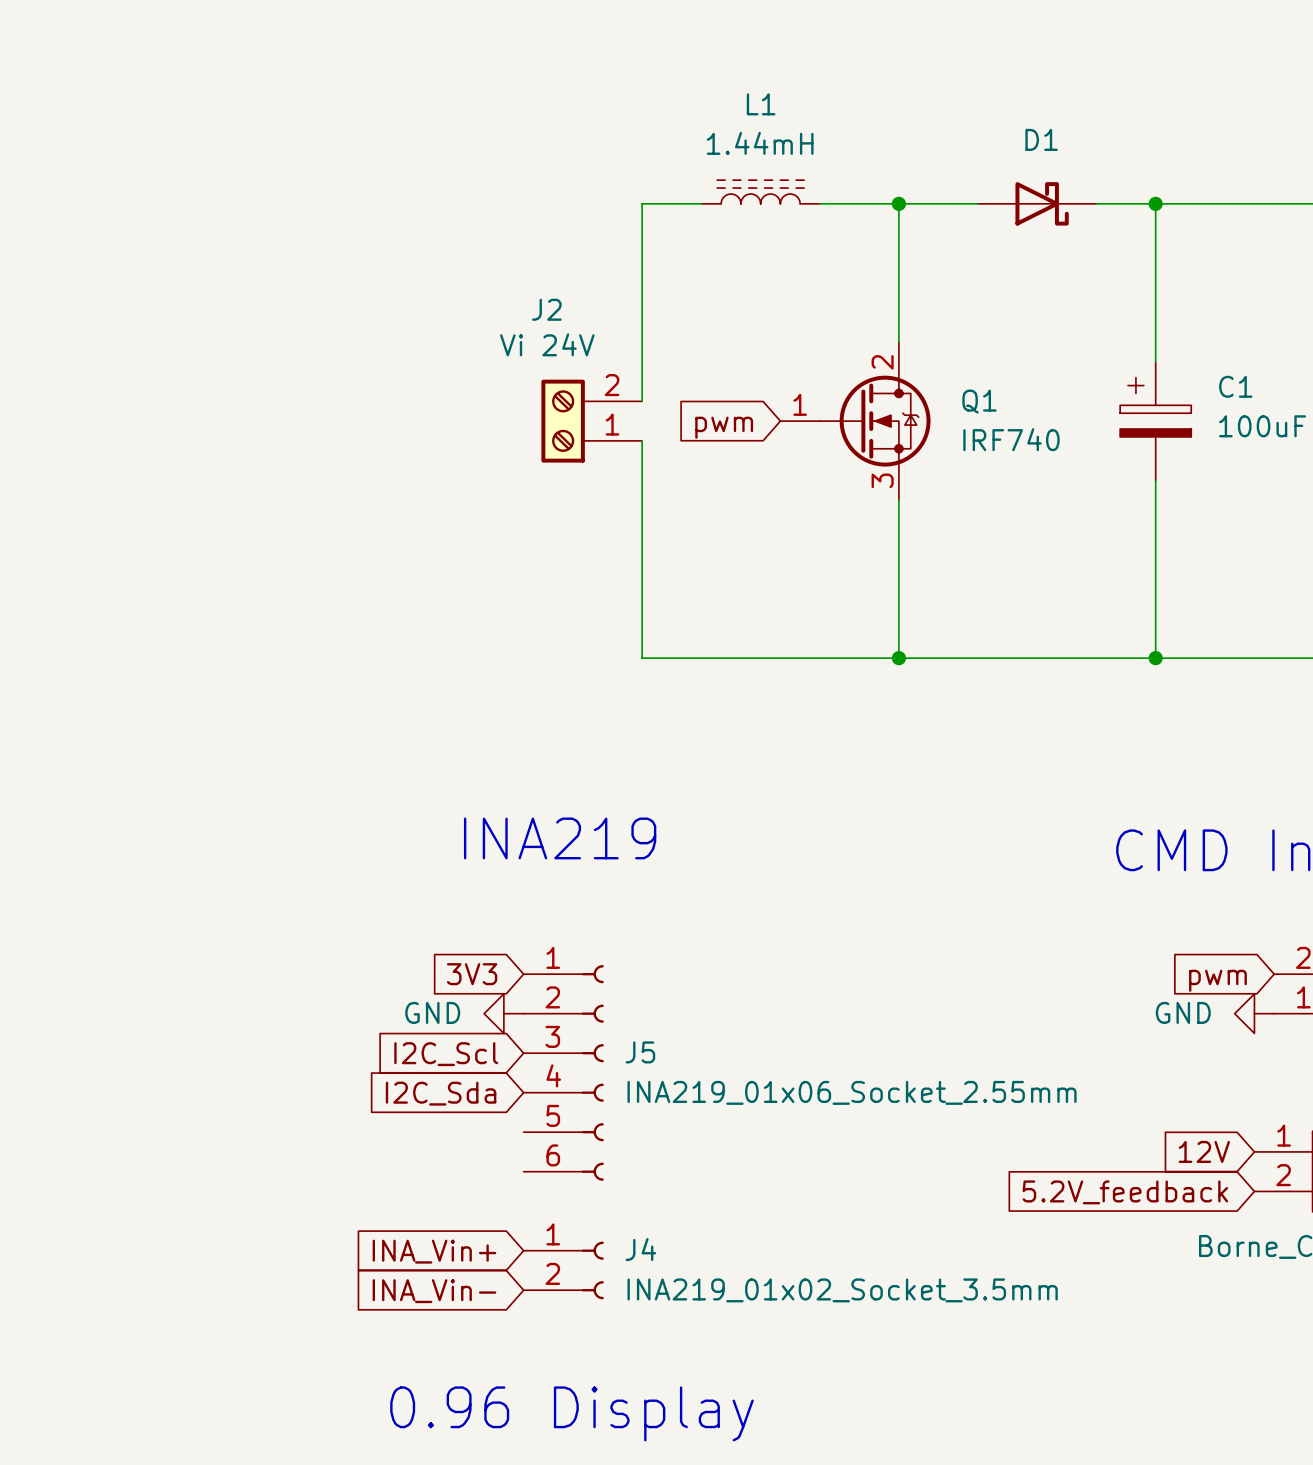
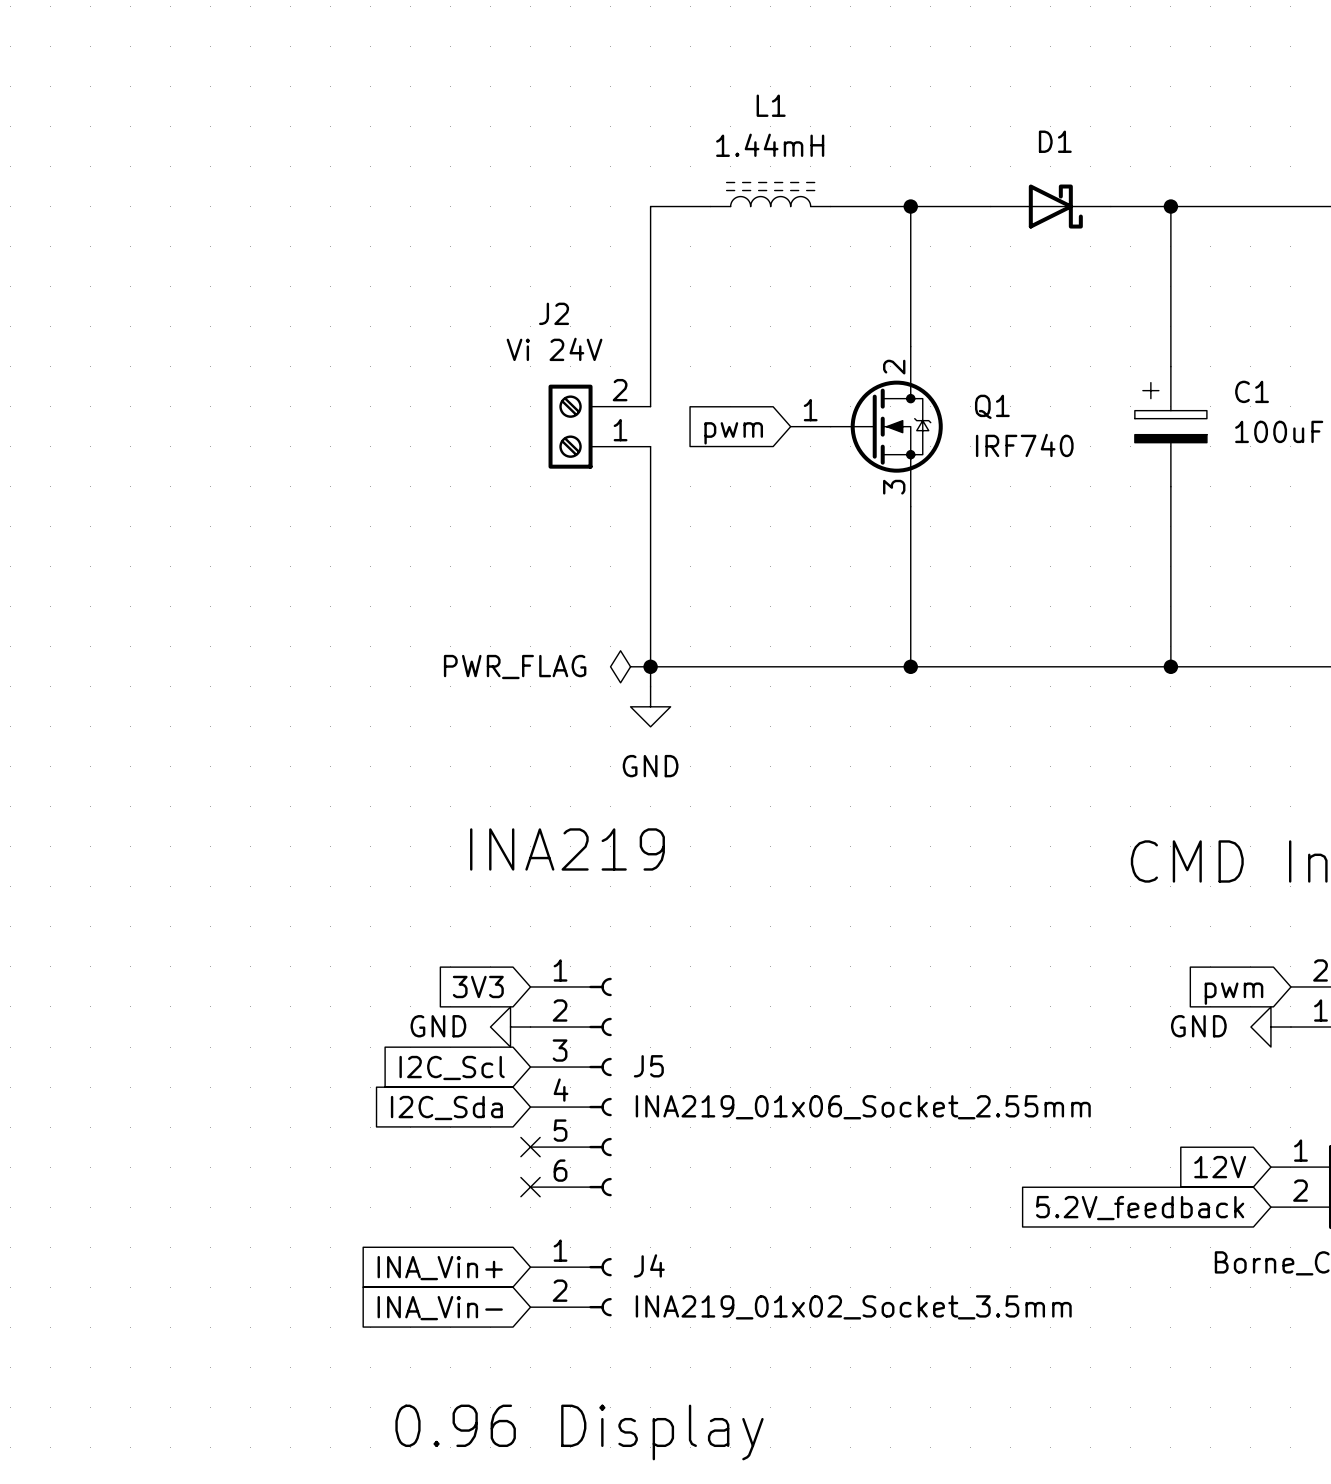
power symbol: none -> PWR_FLAG (630, 666)
wire: none -> (650, 666) (650, 686)
junction: none -> (650, 666)
power symbol: none -> GND (650, 706)
no-connect mark: none -> (530, 1147)
no-connect mark: none -> (530, 1187)

